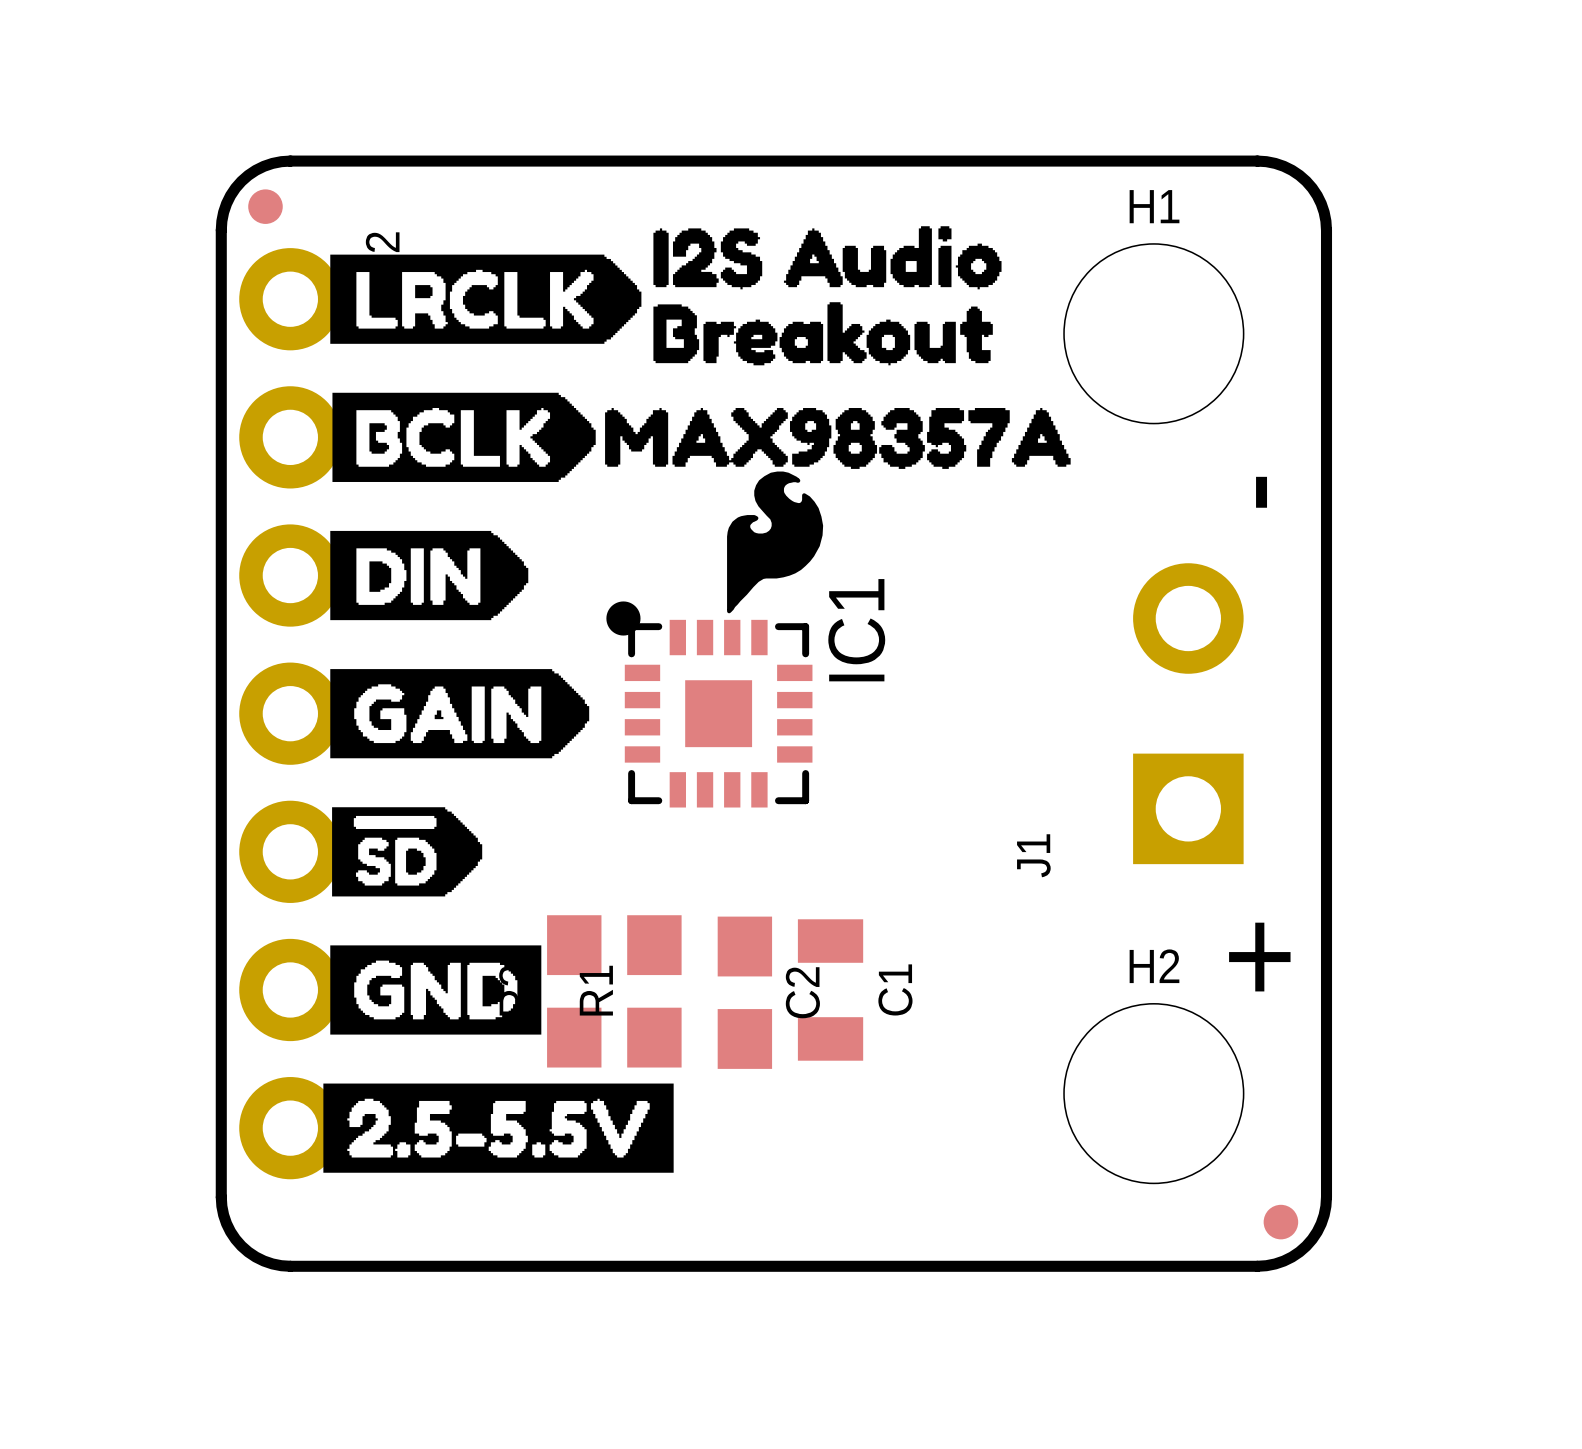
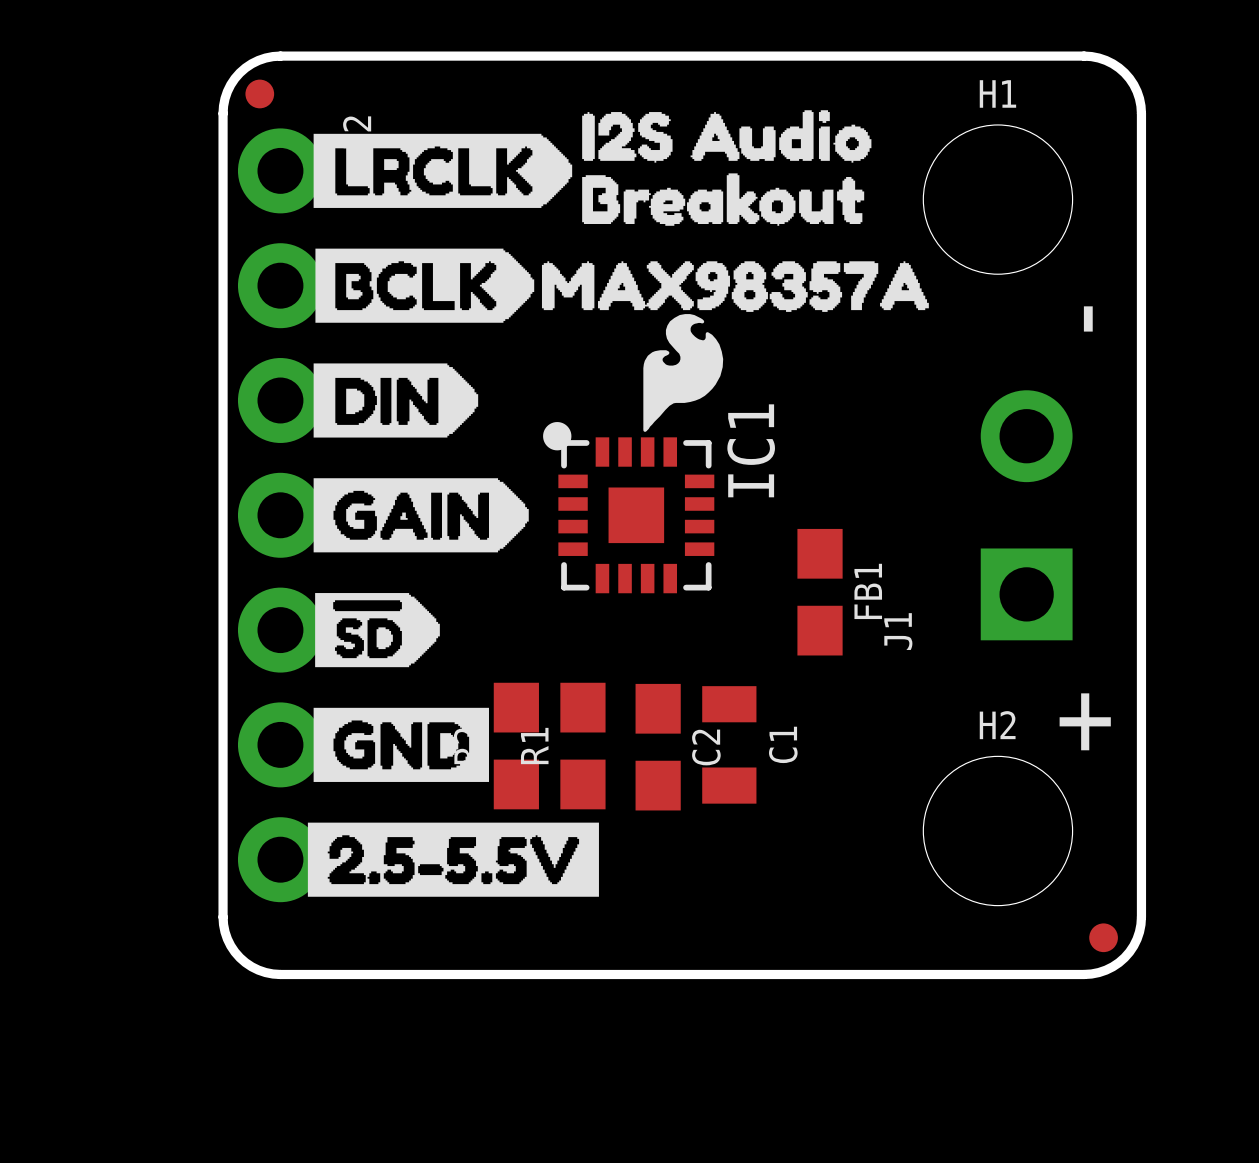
FB1: none -> (820, 592)

